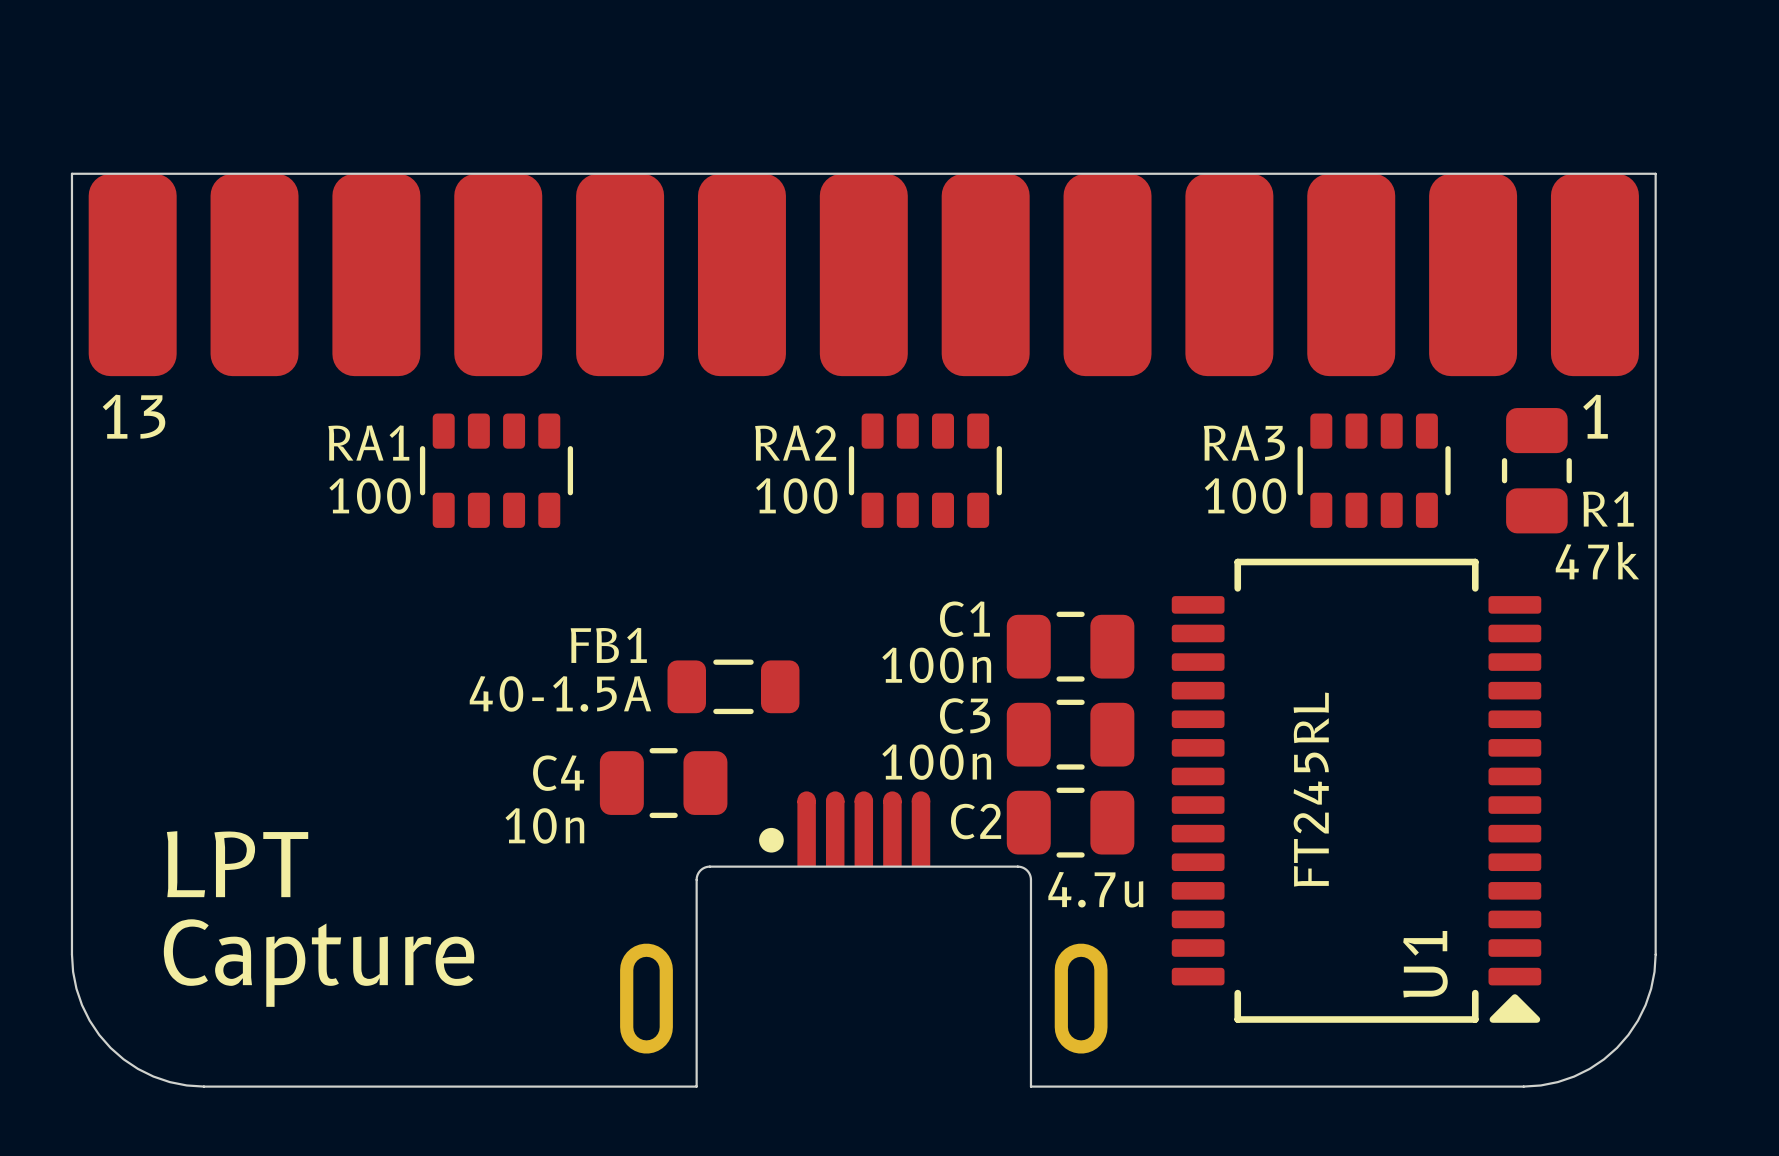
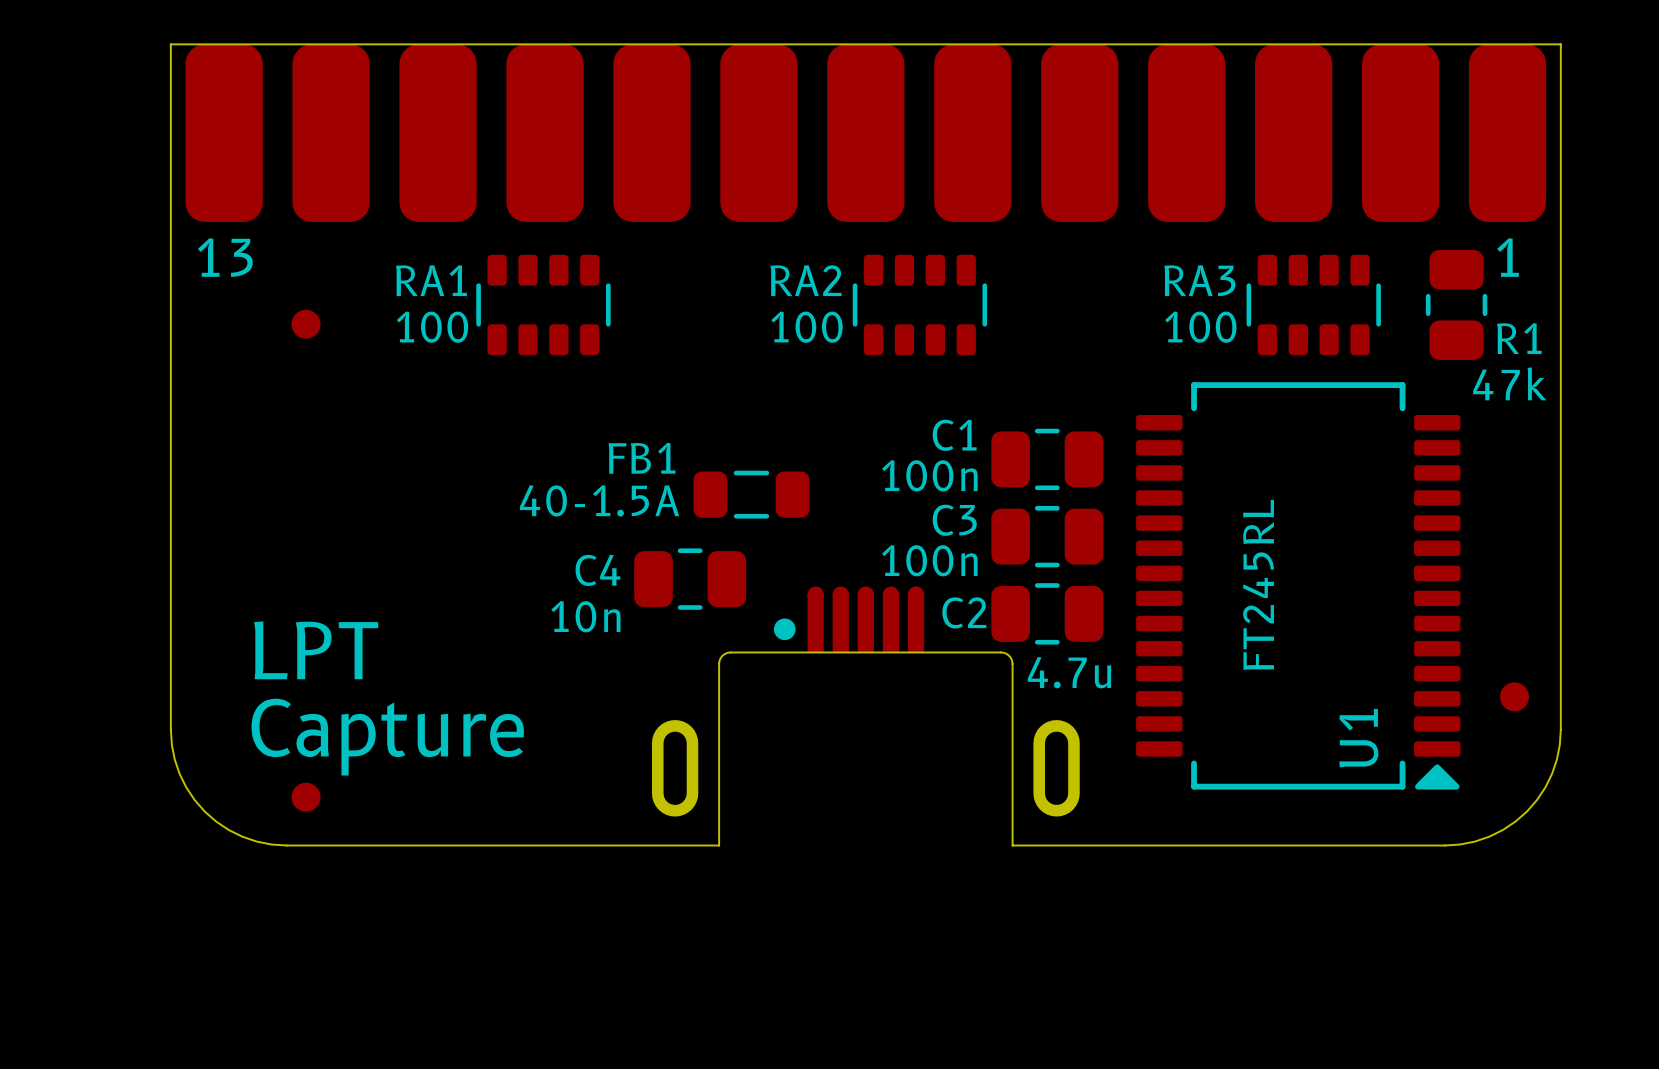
part: none -> (306, 324)
part: none -> (1514, 696)
part: none -> (306, 797)

